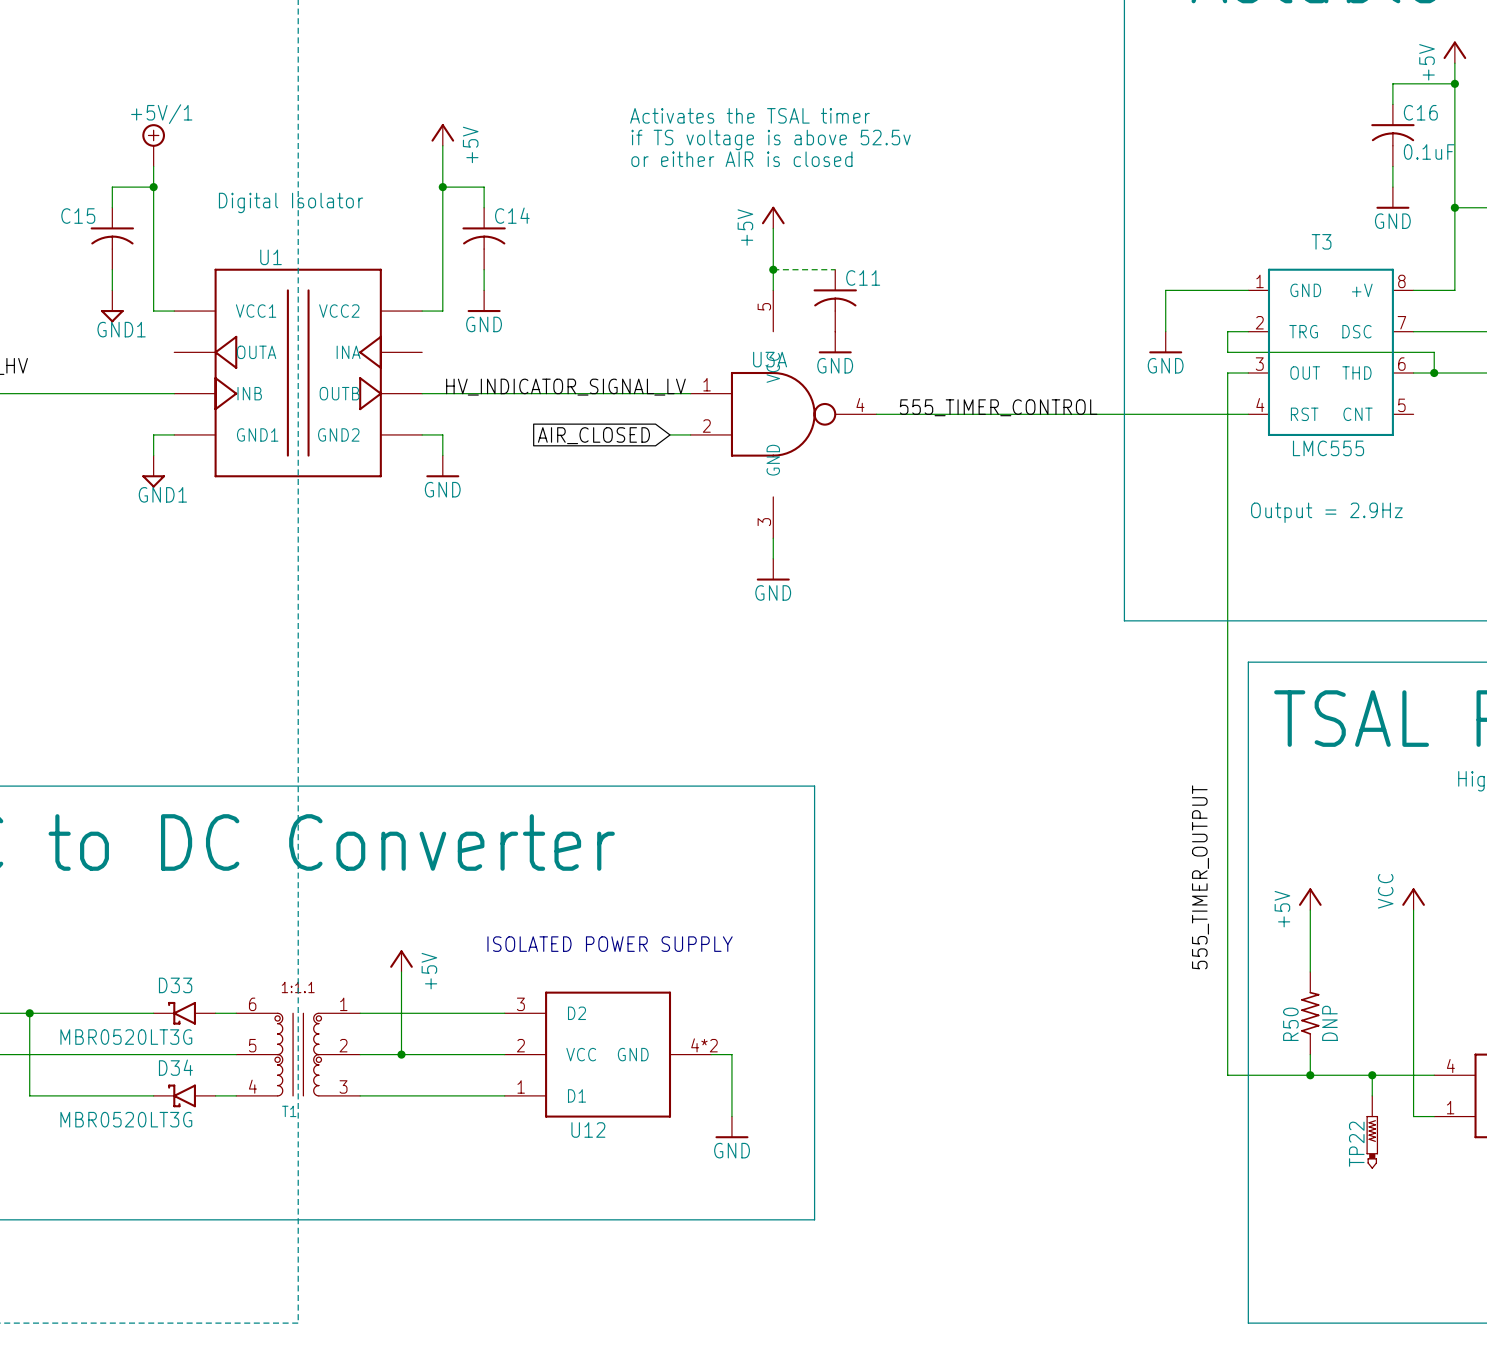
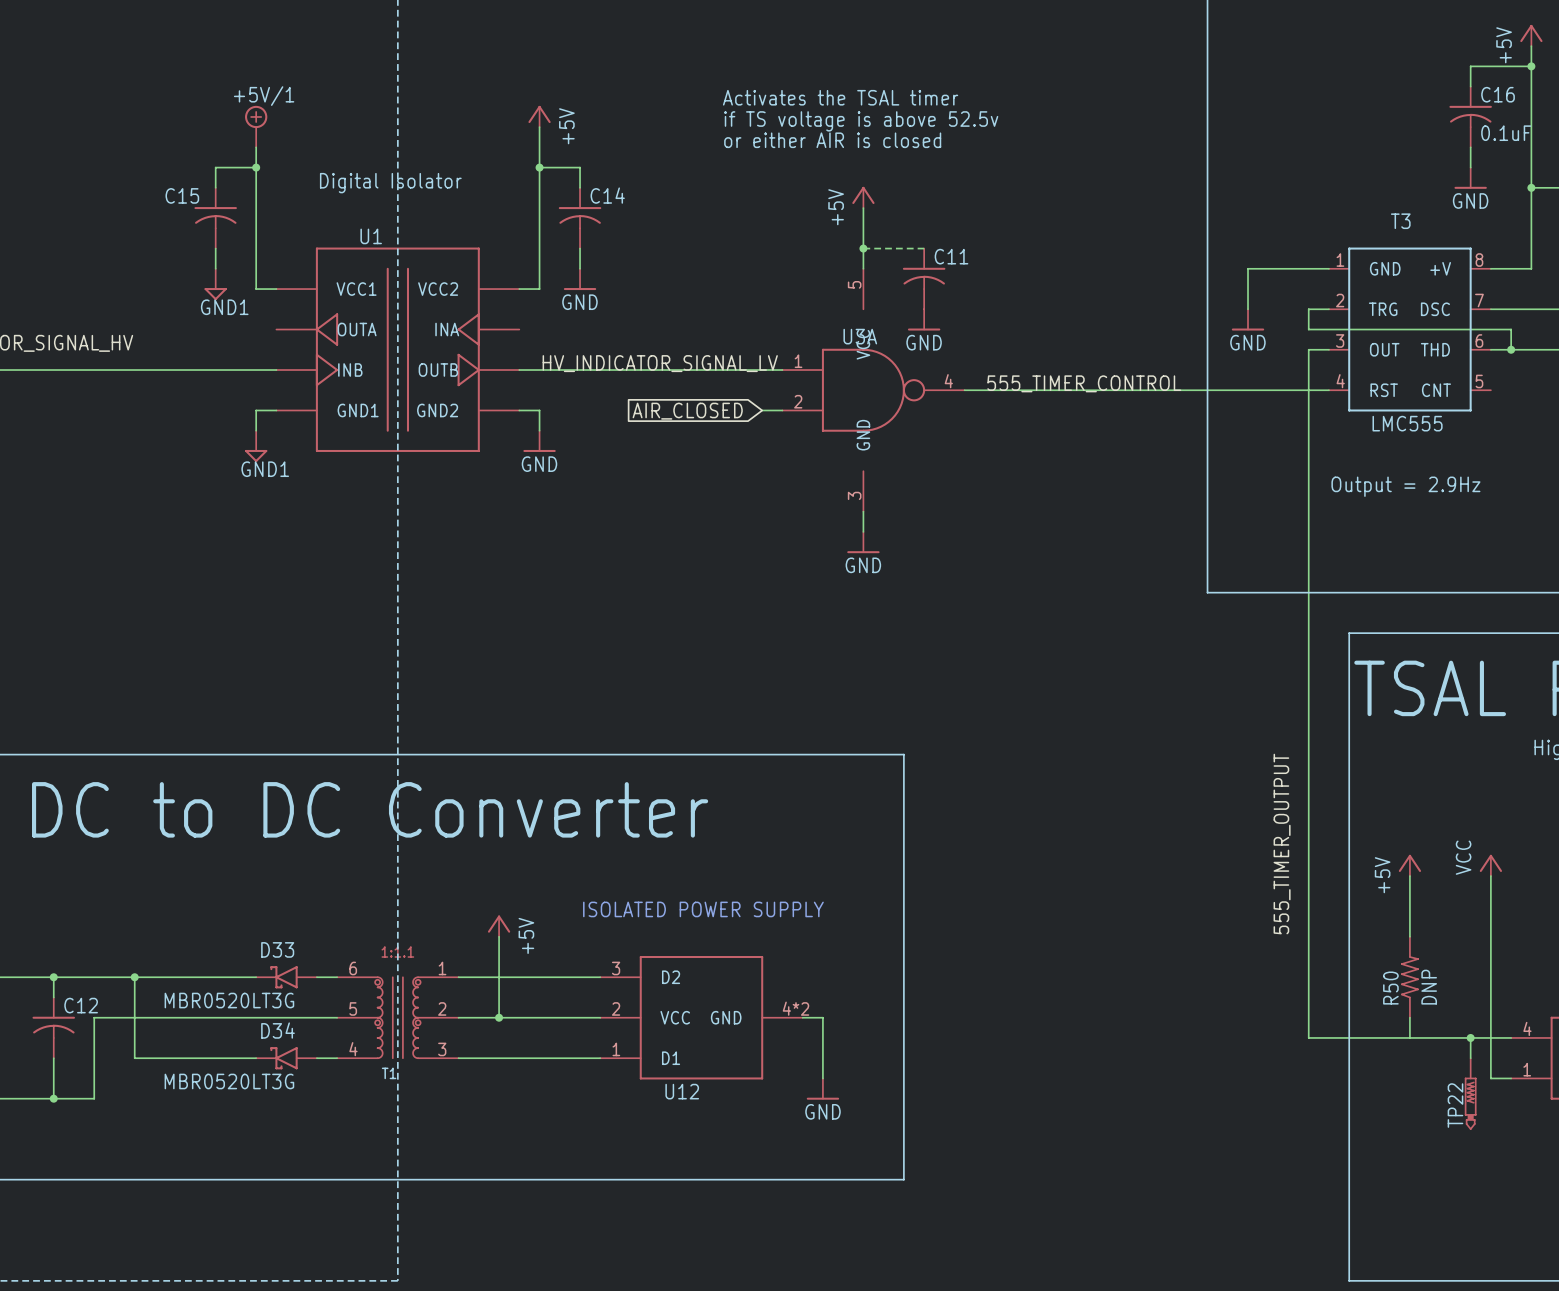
line: (1268, 662) (1248, 662) (1248, 1323) (1268, 1323) -> (1349, 633) (1349, 1280)
power symbol position: +5V (1310, 899) -> +5V (1409, 865)
wire: (1310, 910) (1310, 971) -> (1409, 876) (1409, 936)
R50 position: (1310, 1013) -> (1409, 977)
wire: (1310, 1054) (1310, 1075) -> (1409, 1017) (1409, 1037)
junction: (1310, 1075) -> none
wire: (1372, 1075) (1372, 1095) -> (1470, 1037) (1470, 1058)
junction position: (1372, 1075) -> (1470, 1037)
TP22 position: (1372, 1132) -> (1470, 1093)

